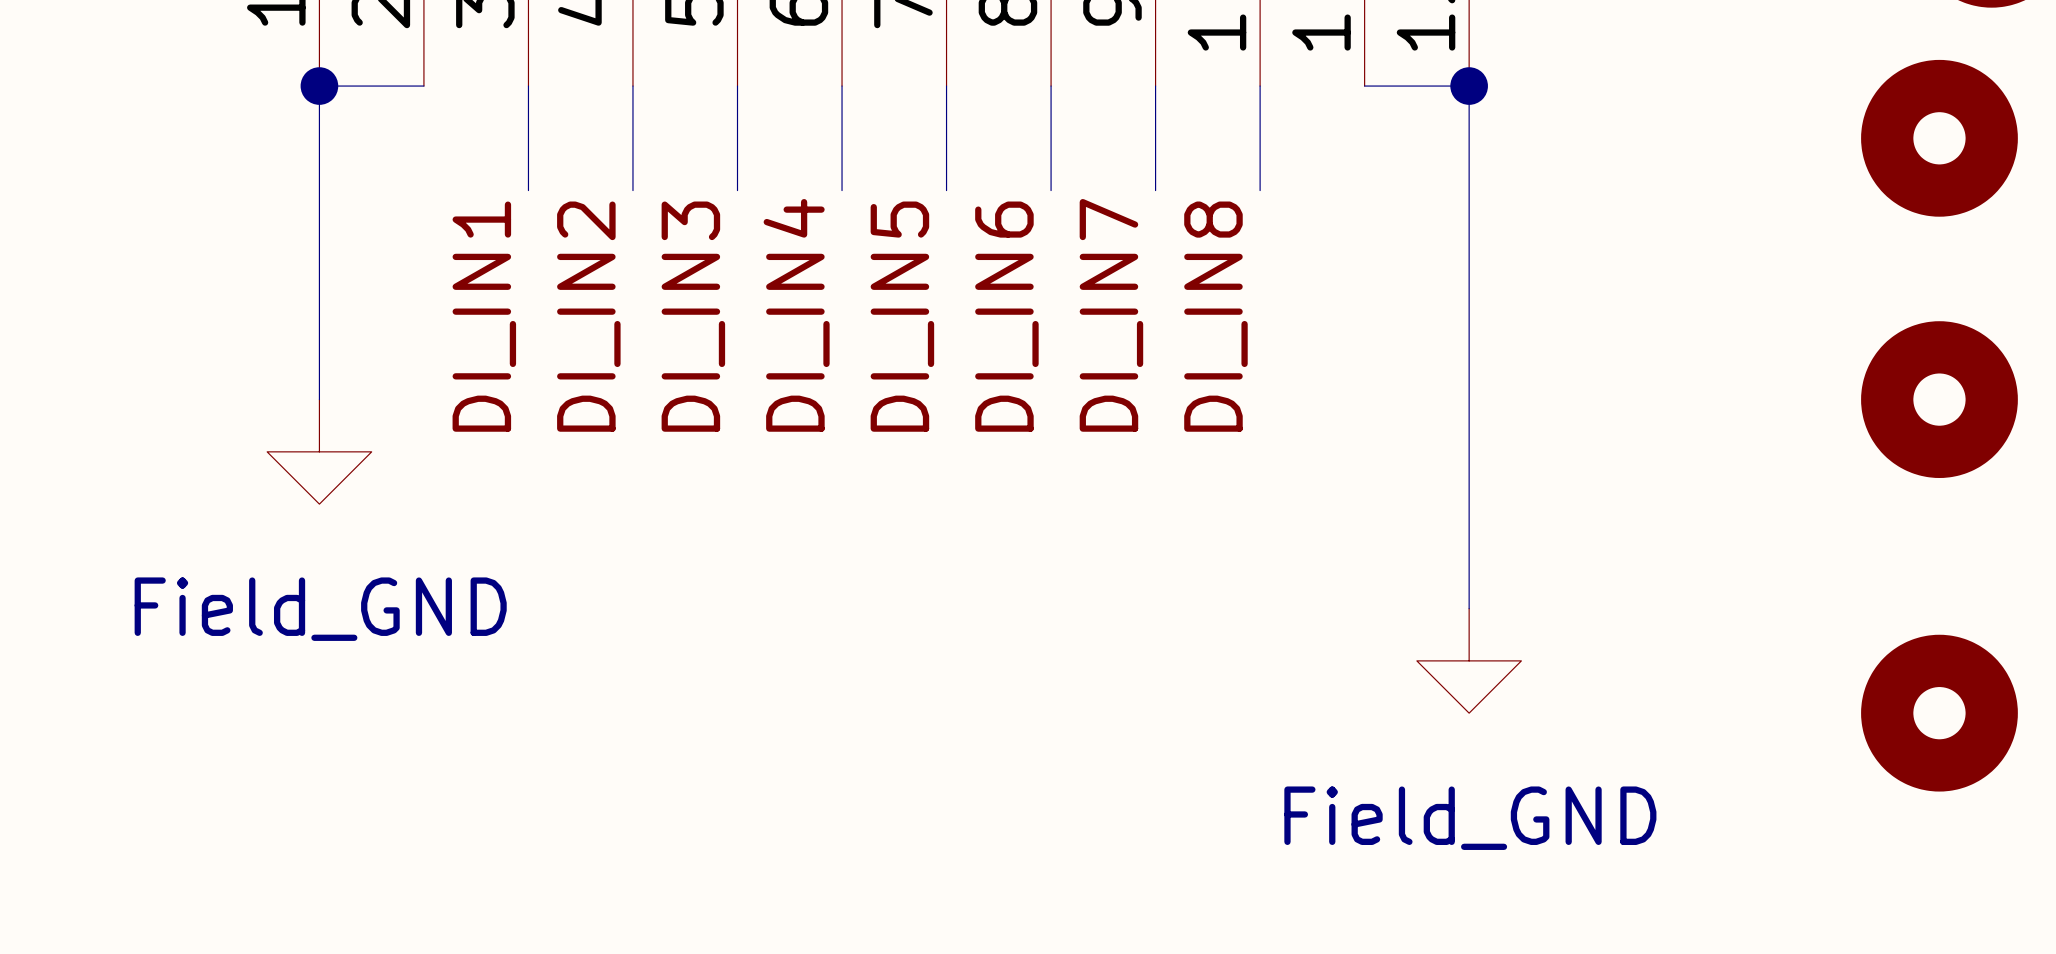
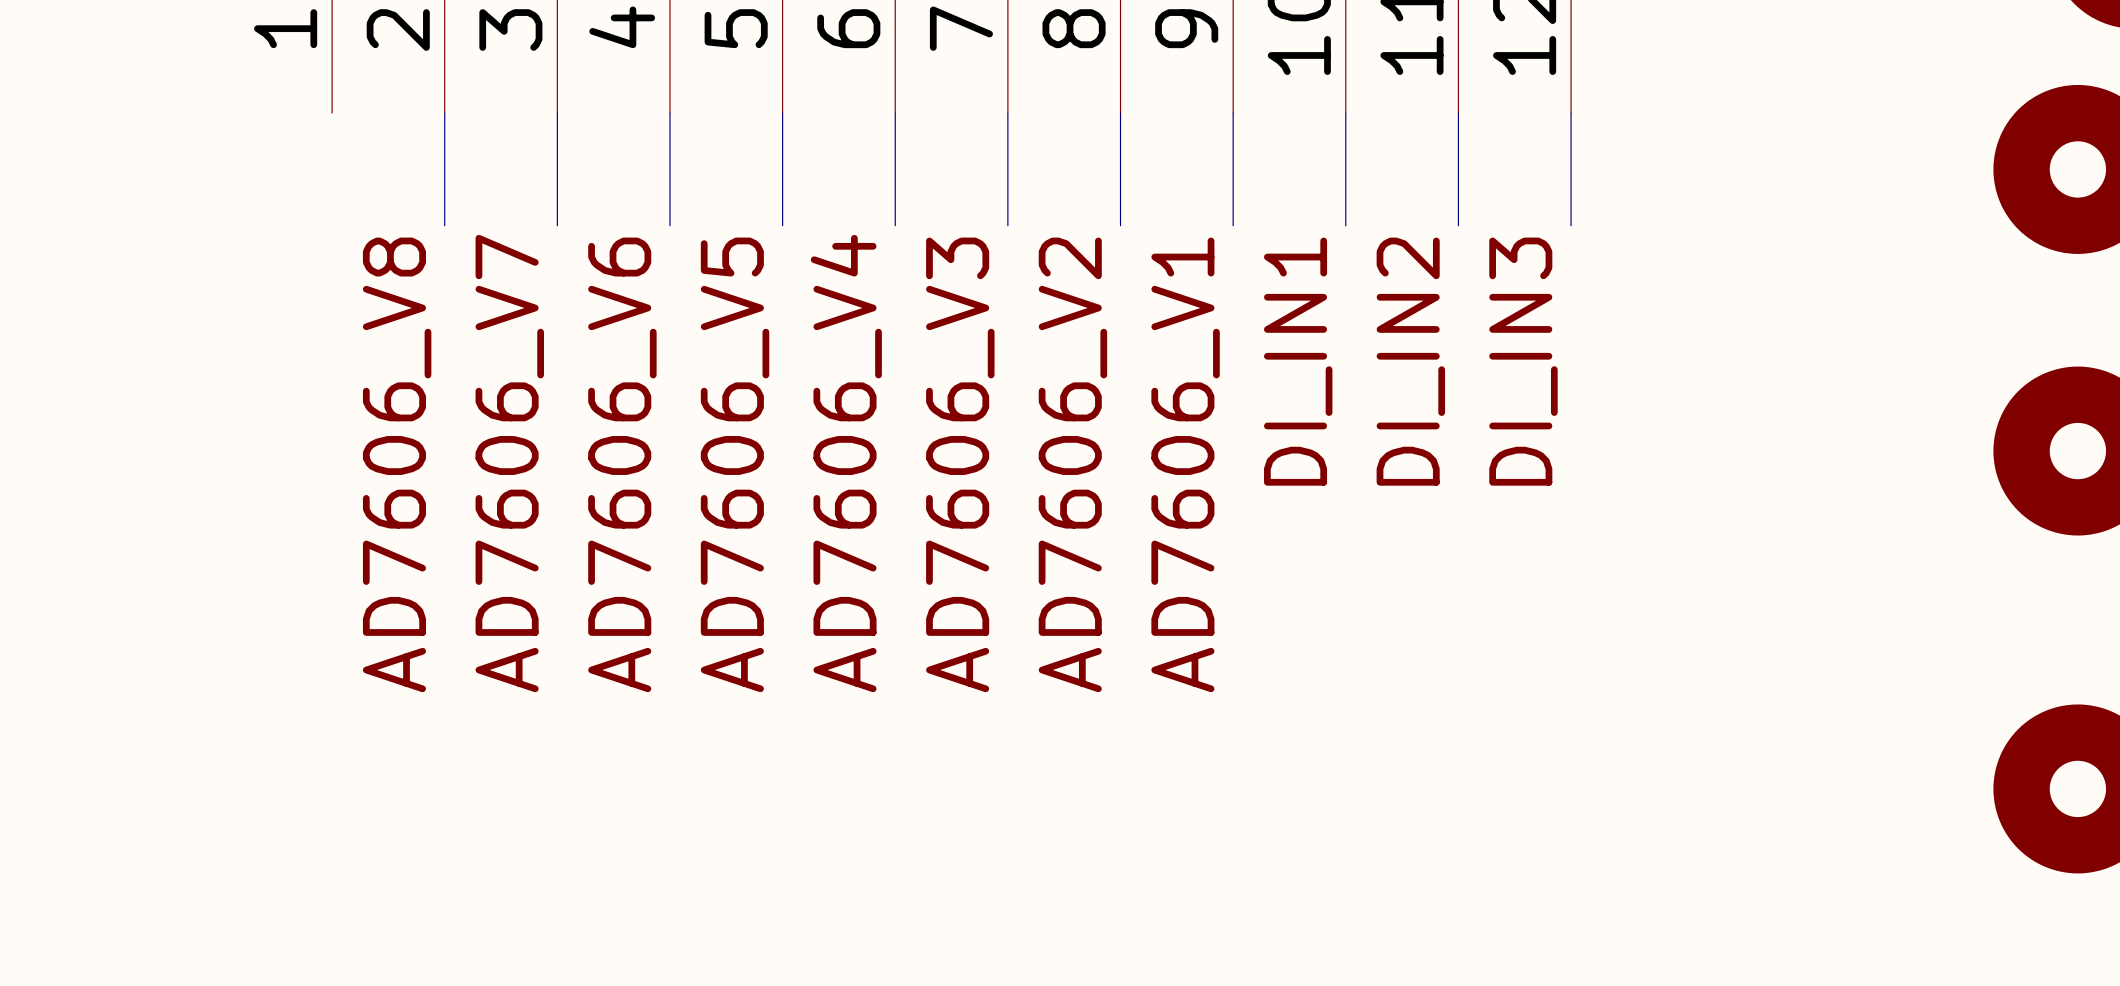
junction: (319, 86) -> none
wire: (423, 86) (319, 86) (319, 399) -> (444, 113) (444, 225)
wire: (1364, 86) (1469, 86) -> (1458, 113) (1458, 225)
junction: (1469, 86) -> none
wire: (1469, 190) (1469, 608) -> none
label: DI_IN4 (796, 315) -> AD7606_V4 (846, 463)
label: DI_IN7 (1111, 315) -> AD7606_V1 (1185, 464)
label: DI_IN1 (484, 316) -> AD7606_V7 (509, 463)
label: DI_IN2 (588, 316) -> AD7606_V6 (622, 464)
label: DI_IN3 (693, 316) -> AD7606_V5 (735, 464)
label: DI_IN5 (902, 316) -> AD7606_V3 (960, 464)
label: DI_IN6 (1006, 316) -> AD7606_V2 (1072, 464)
label: DI_IN8 (1215, 316) -> DI_IN1 (1298, 361)
label: none -> DI_IN2 (1410, 361)
label: none -> DI_IN3 (1523, 361)
label: none -> AD7606_V8 (397, 464)
power symbol: Field_GND (319, 451) -> none
power symbol: Field_GND (1469, 660) -> none

